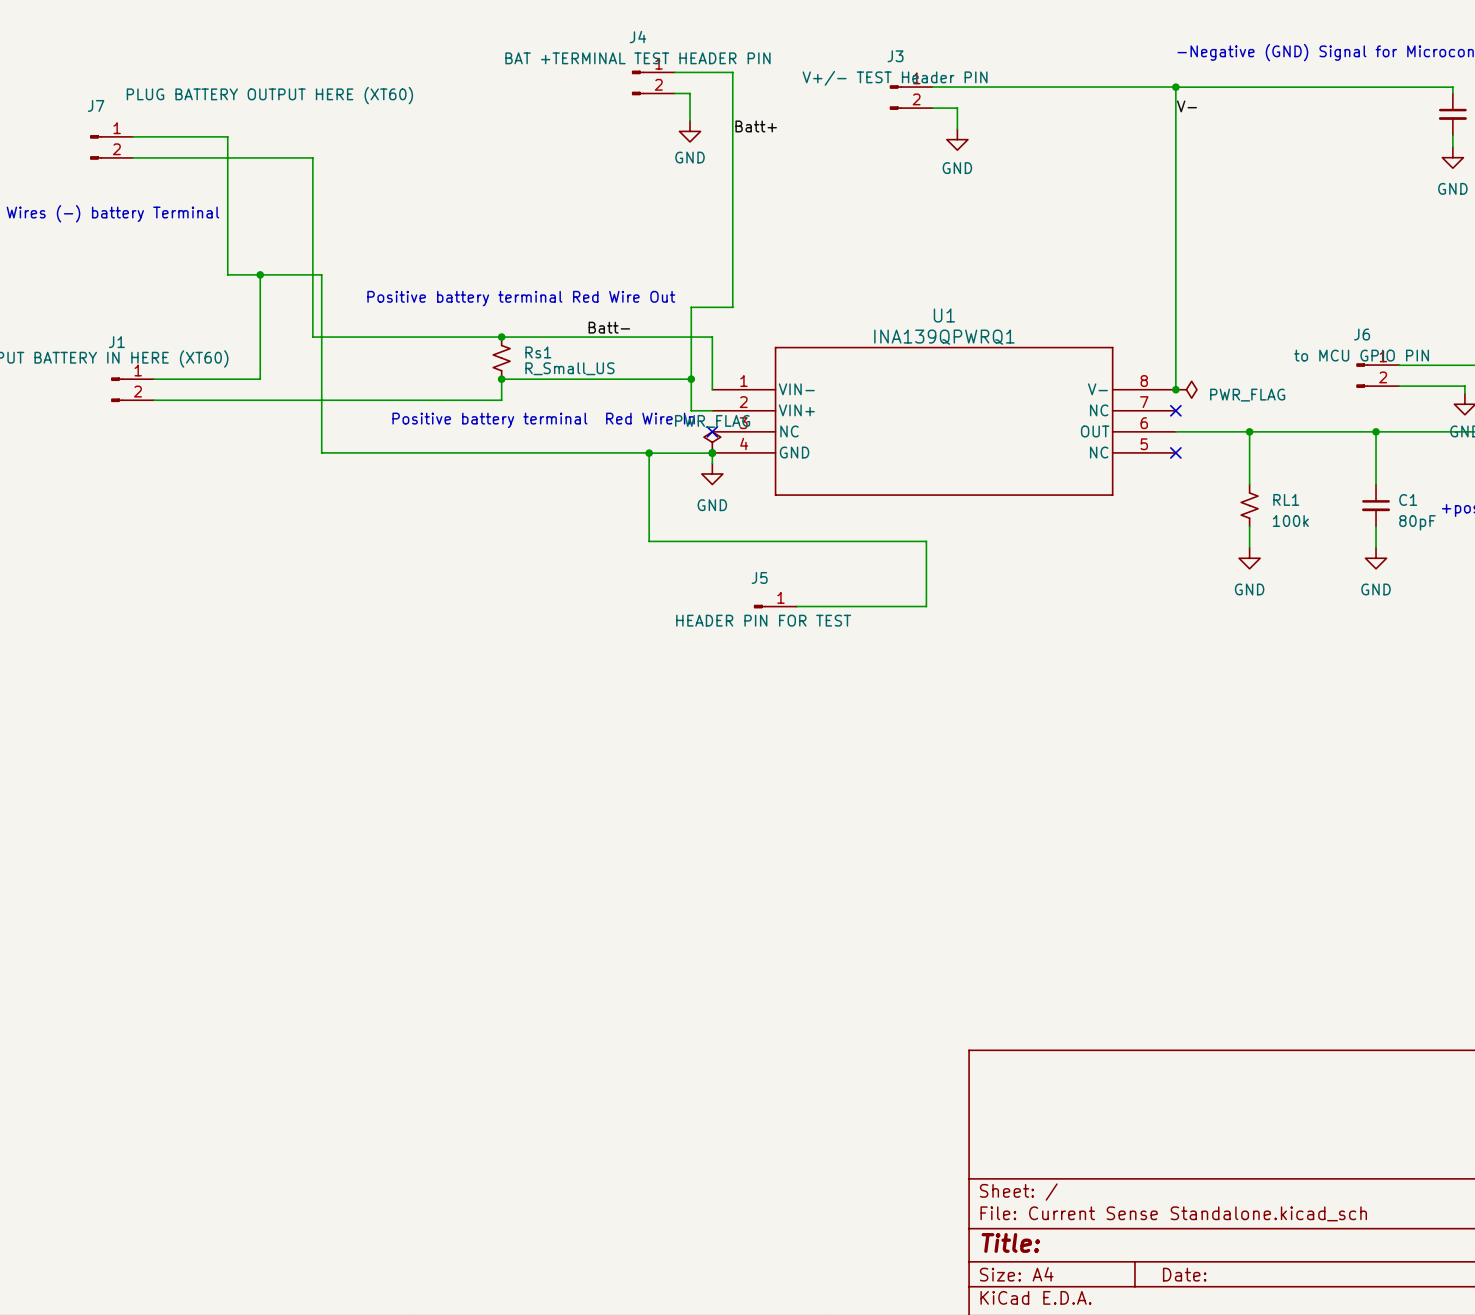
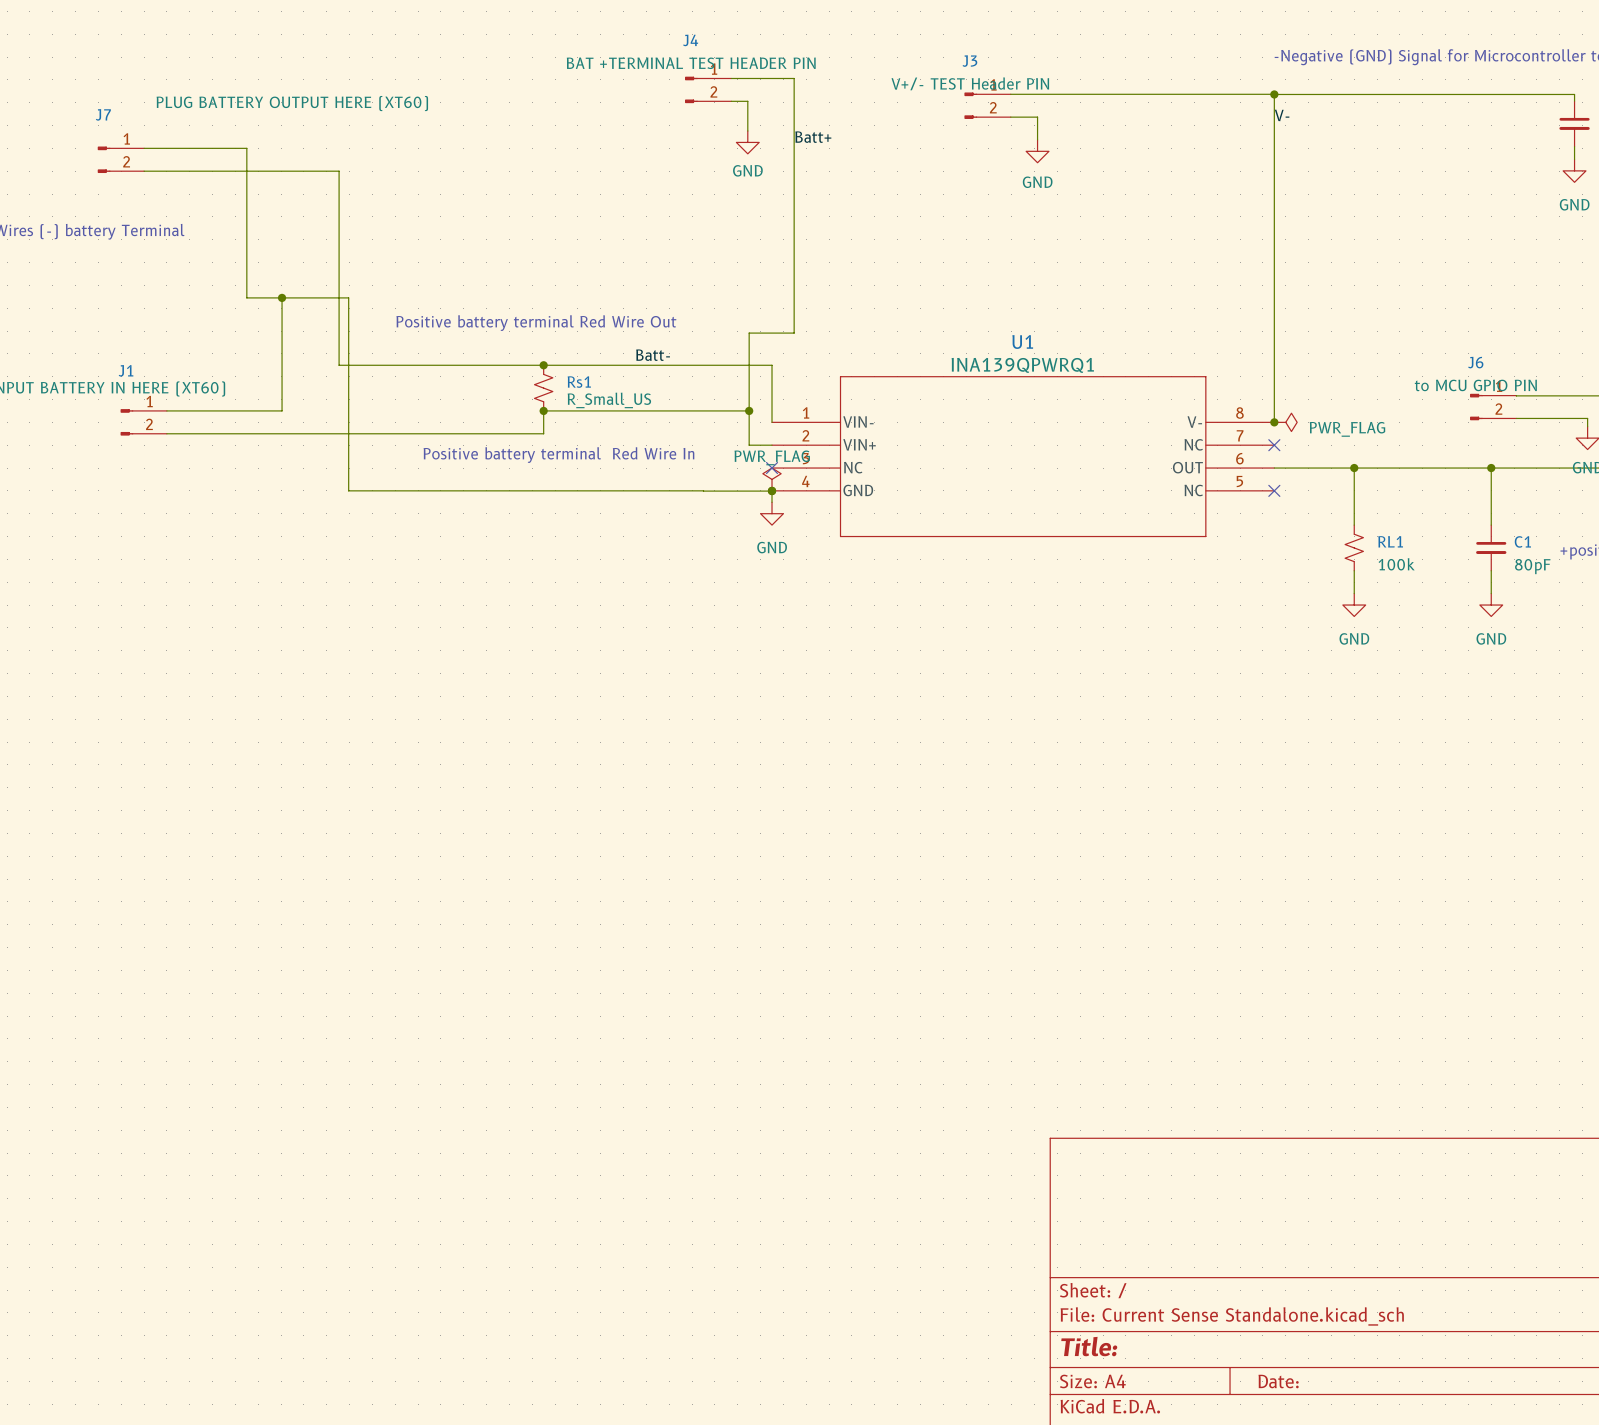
wire: (649, 453) (649, 541) (926, 541) (926, 606) (796, 606) -> none
junction: (649, 453) -> none
J5: HEADER PIN FOR TEST (775, 606) -> none

